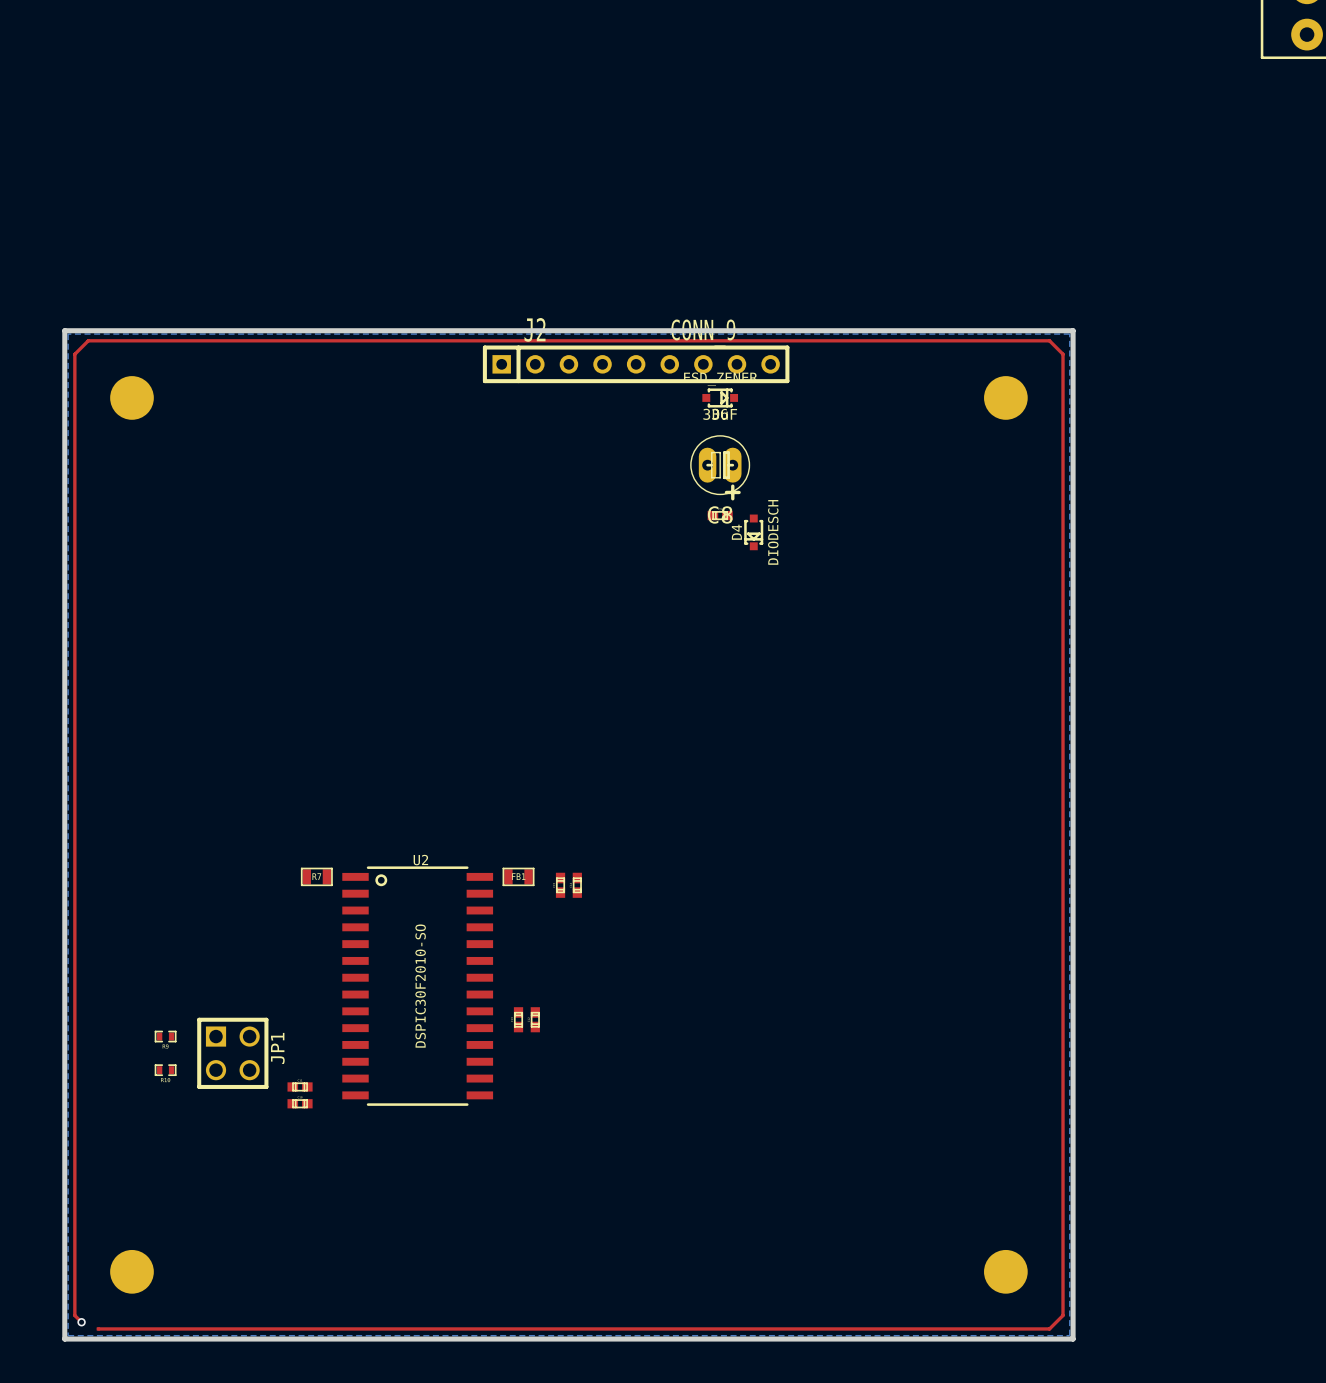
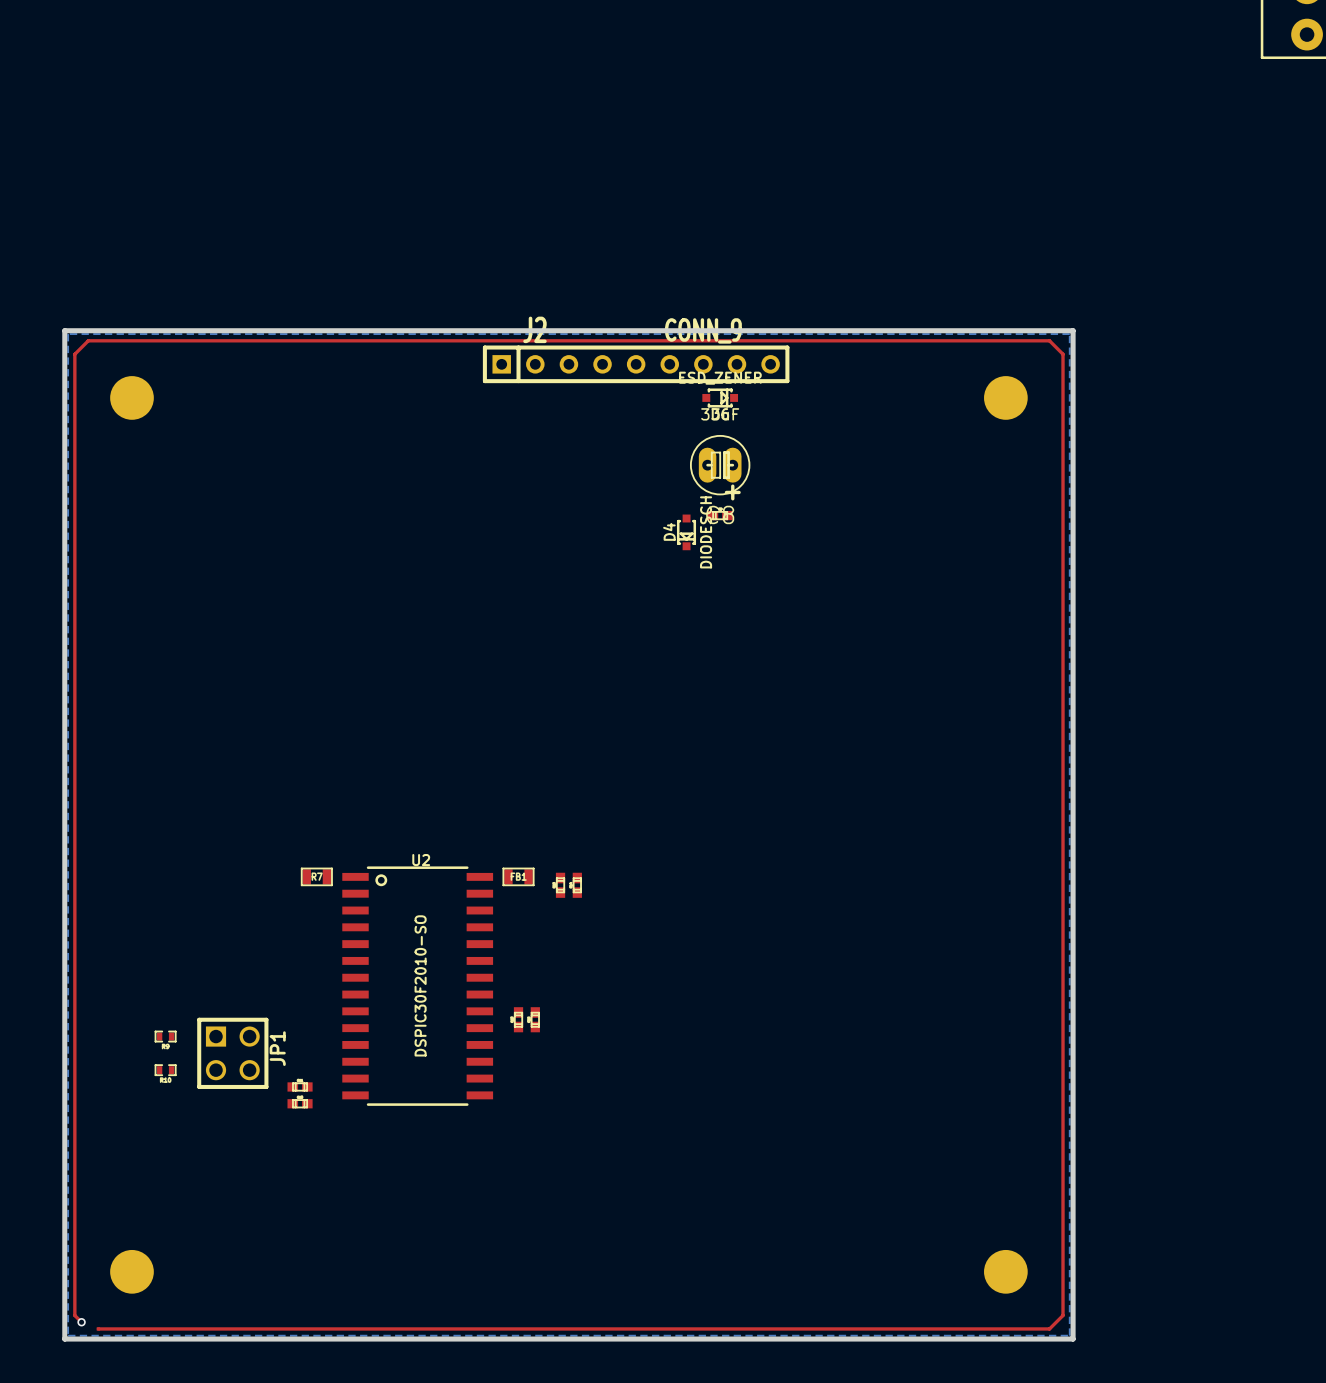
D4 position: (753, 532) -> (686, 532)

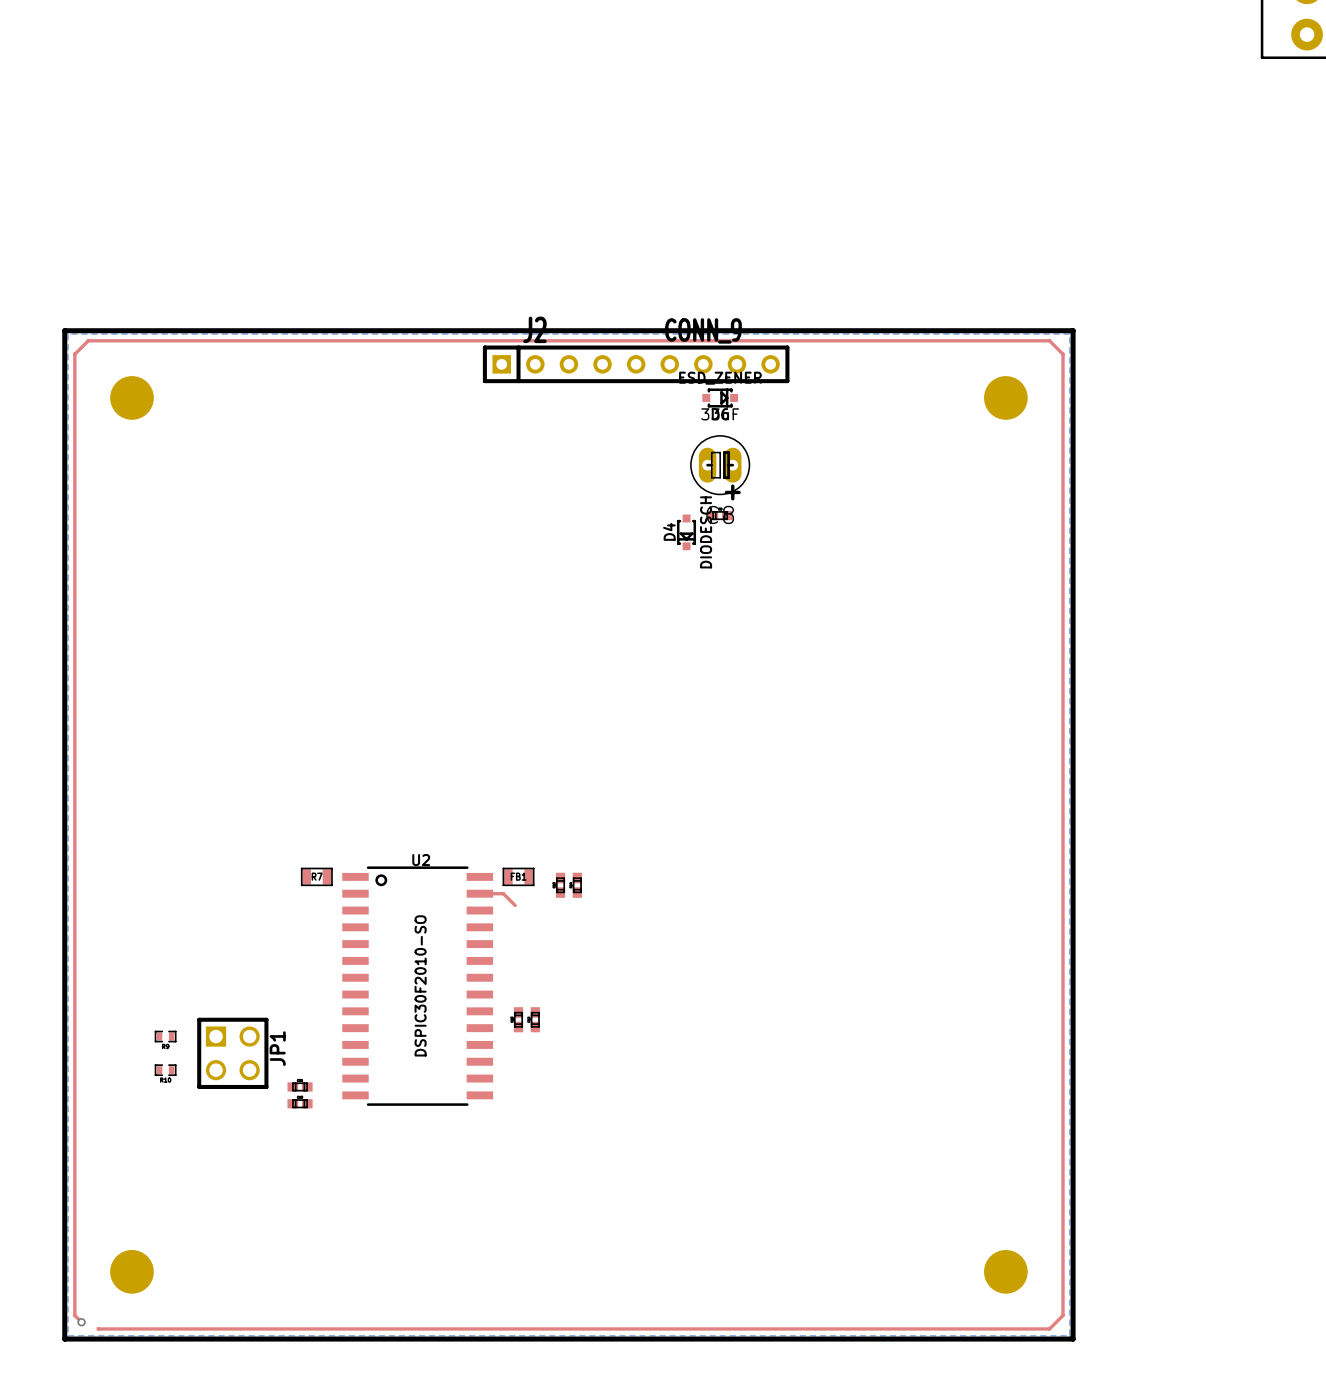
top track: none -> (479, 893) (503, 893) (515, 905)

